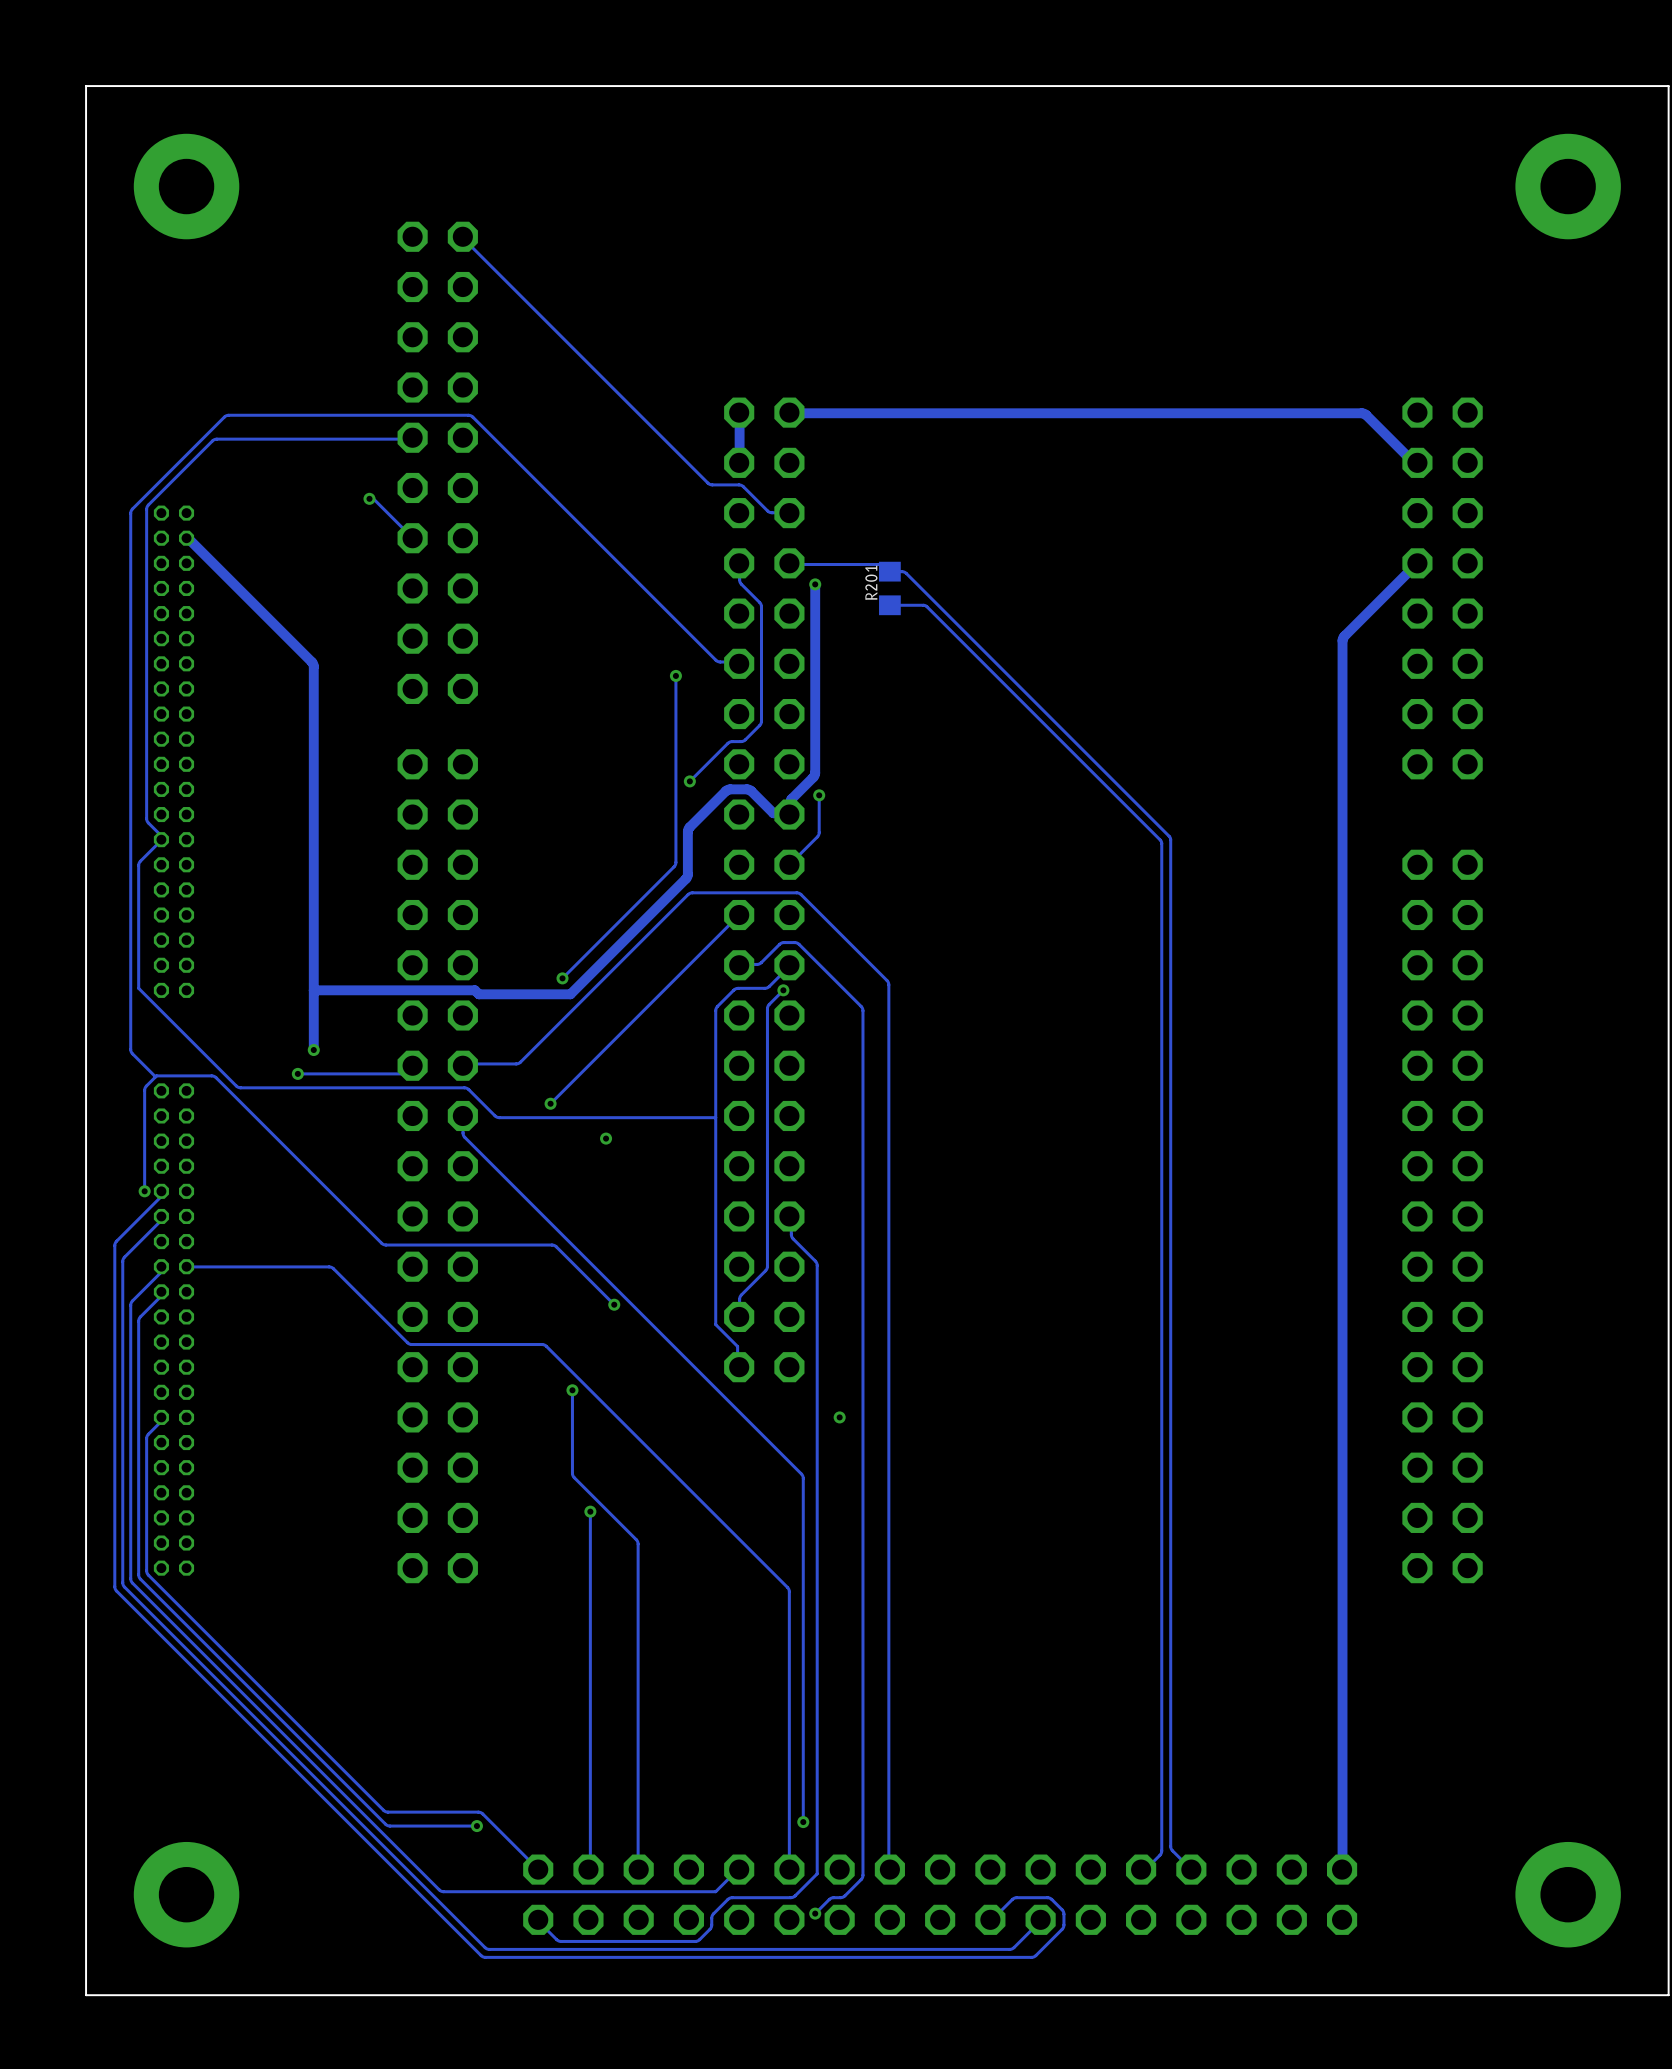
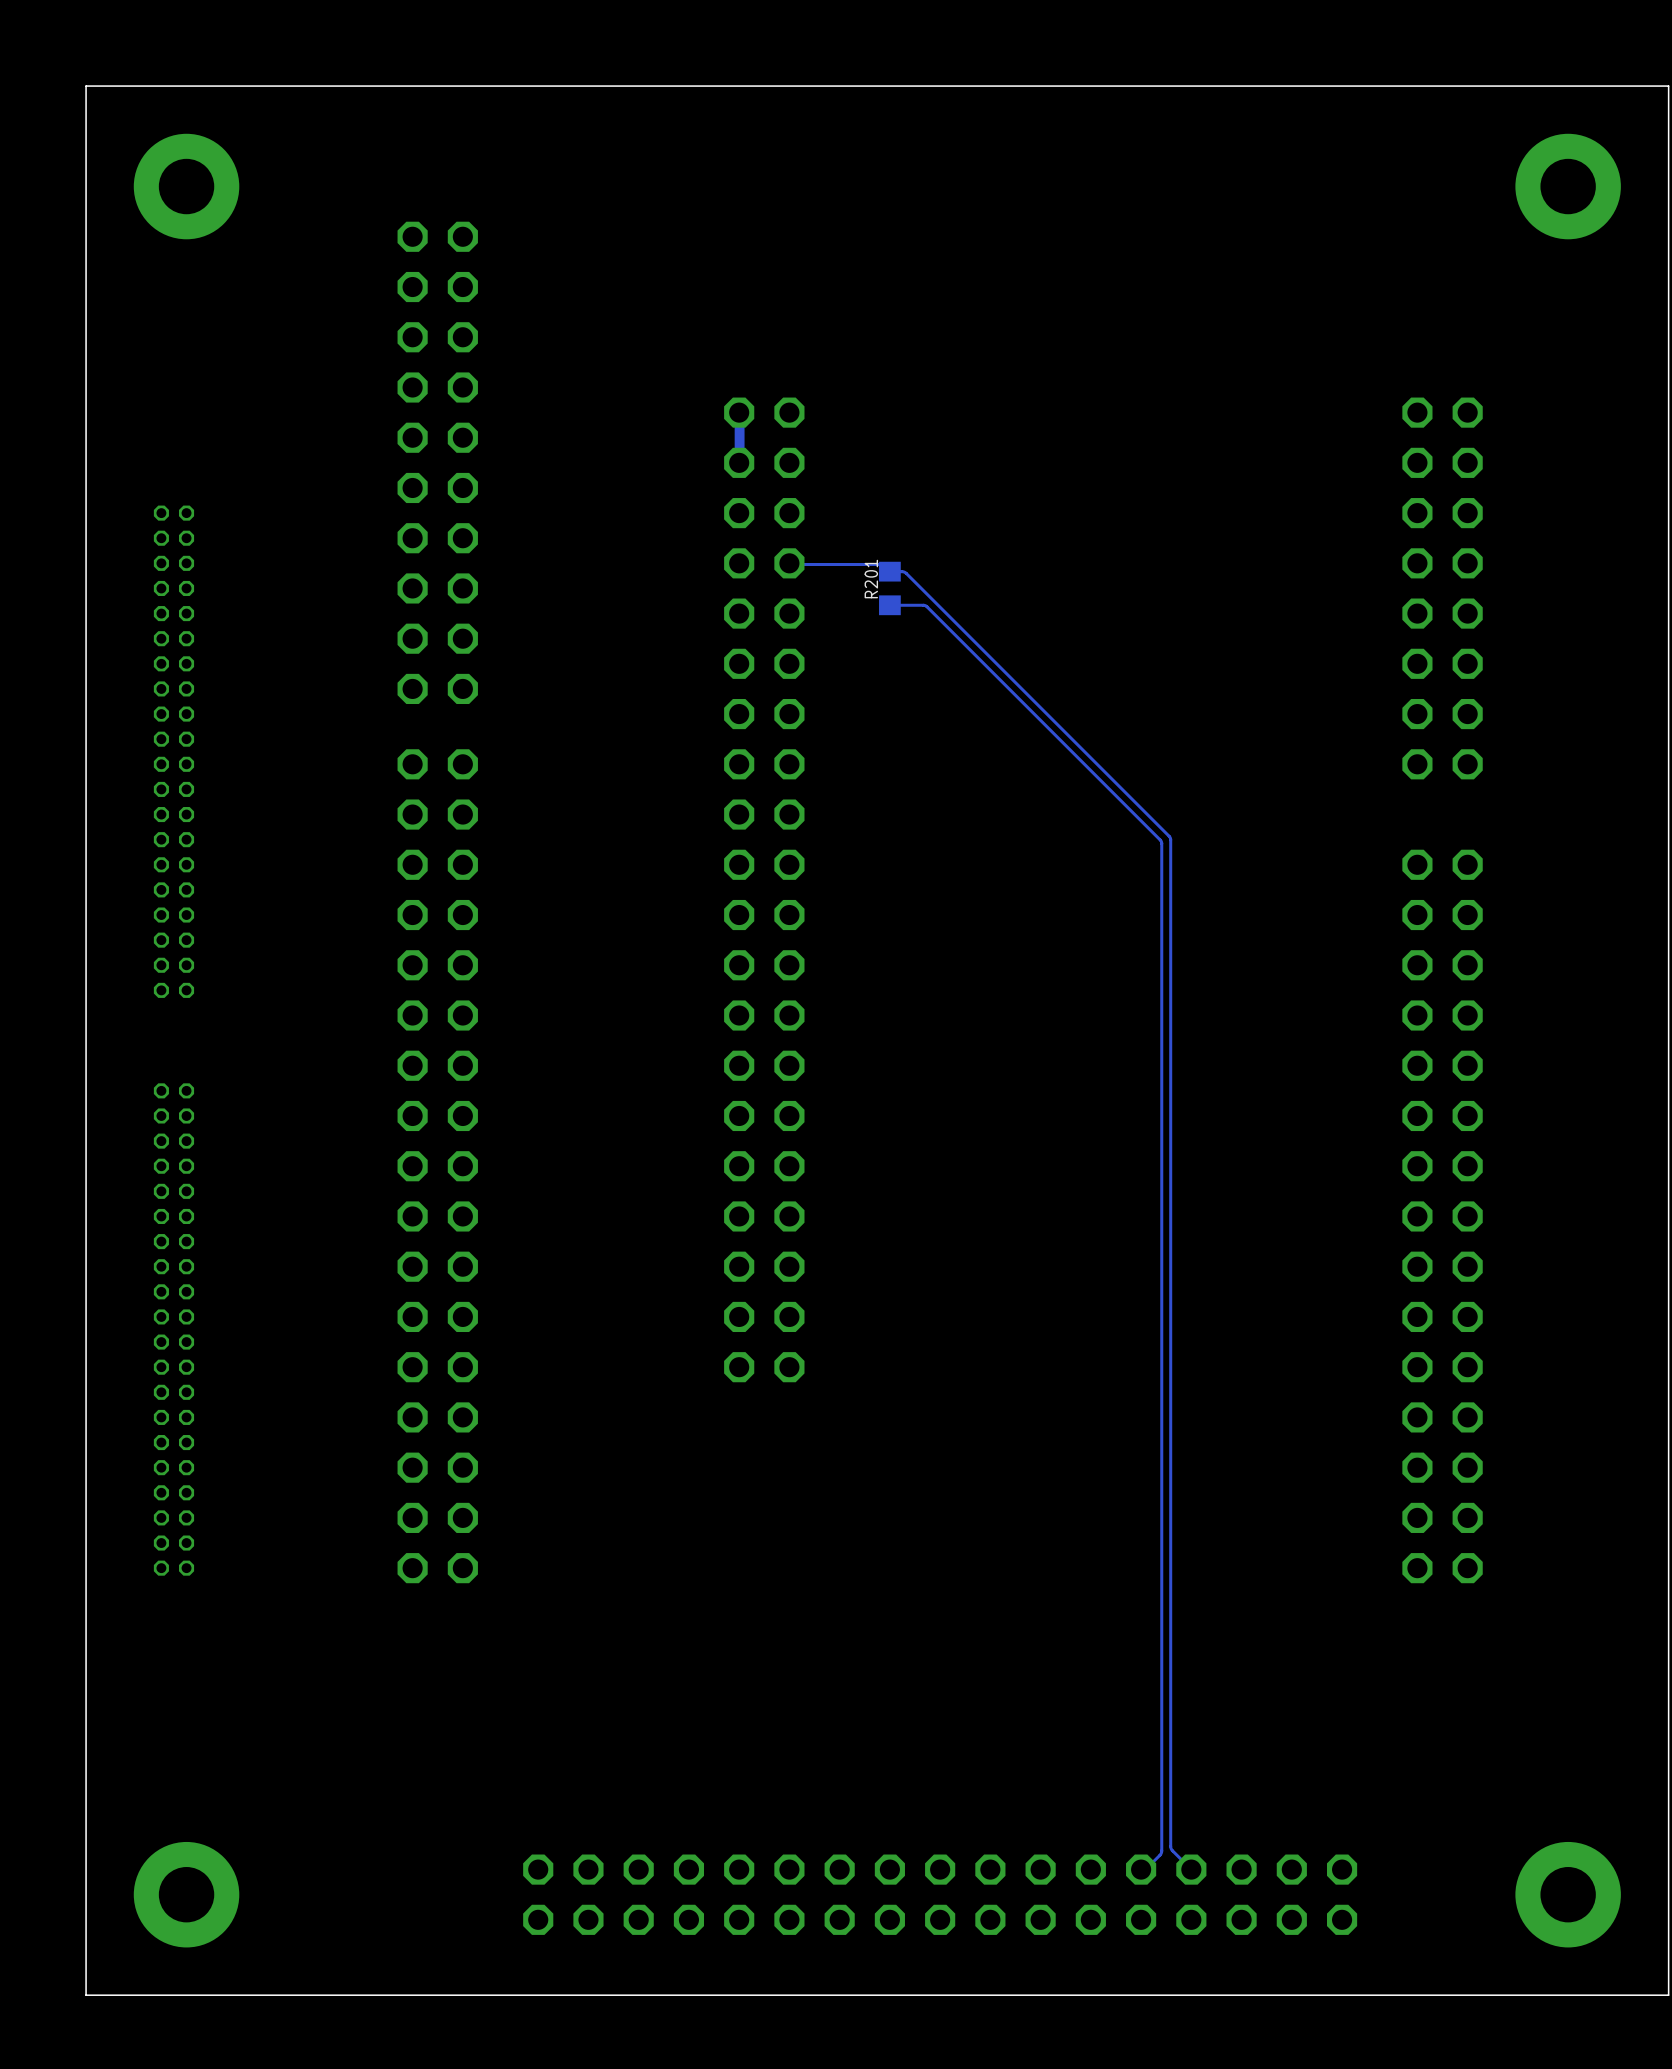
track: (462, 236) (708, 483) (741, 485) (768, 511) (789, 512) -> none
track: (789, 412) (1362, 413) (1412, 461) (1417, 462) -> none
track: (412, 437) (215, 439) (147, 506) (146, 818) (160, 835) (161, 839) (138, 864) (138, 988) (239, 1087) (464, 1087) (468, 1089) (498, 1117) (715, 1117) -> none
track: (369, 498) (373, 498) (412, 538) -> none
via: (369, 498) -> none
track: (186, 538) (313, 664) (313, 1050) -> none
track: (739, 563) (740, 582) (761, 606) (761, 722) (744, 740) (728, 742) (689, 781) -> none
track: (1417, 563) (1344, 636) (1342, 640) (1342, 1869) -> none
track: (815, 584) (814, 775) (791, 799) (789, 814) (773, 813) (749, 789) (730, 789) (725, 791) (688, 829) (686, 878) (570, 994) (478, 994) (474, 990) (313, 990) -> none
via: (815, 584) -> none
track: (739, 663) (737, 662) (715, 660) (470, 415) (225, 416) (130, 512) (130, 1049) (132, 1053) (155, 1076) -> none
track: (675, 675) (675, 864) (562, 978) -> none
via: (675, 675) -> none
via: (689, 781) -> none
track: (819, 795) (818, 834) (789, 864) -> none
via: (819, 795) -> none
track: (739, 915) (550, 1103) -> none
track: (739, 965) (759, 963) (780, 943) (797, 943) (862, 1010) (862, 1875) (861, 1879) (844, 1896) (830, 1898) (815, 1913) -> none
track: (789, 965) (768, 987) (735, 988) (715, 1010) (715, 1324) (737, 1346) (737, 1366) (739, 1367) -> none
via: (562, 978) -> none
track: (783, 990) (768, 1005) (767, 1008) (767, 1267) (740, 1296) (739, 1316) -> none
via: (783, 990) -> none
via: (313, 1050) -> none
track: (412, 1065) (403, 1073) (297, 1073) -> none
track: (462, 1065) (463, 1063) (519, 1062) (691, 892) (799, 893) (888, 981) (889, 1869) -> none
via: (297, 1073) -> none
via: (550, 1103) -> none
track: (462, 1115) (464, 1137) (802, 1476) (803, 1822) -> none
via: (606, 1138) -> none
track: (144, 1191) (145, 1087) (156, 1075) (213, 1076) (382, 1244) (553, 1245) (614, 1304) -> none
via: (144, 1191) -> none
track: (161, 1191) (160, 1197) (114, 1244) (115, 1589) (481, 1955) (485, 1957) (1032, 1957) (1062, 1928) (1063, 1913) (1049, 1897) (1015, 1897) (990, 1919) -> none
track: (161, 1216) (160, 1221) (122, 1260) (123, 1585) (485, 1948) (1009, 1949) (1014, 1947) (1040, 1919) -> none
track: (789, 1216) (791, 1217) (792, 1237) (815, 1261) (817, 1265) (817, 1873) (792, 1897) (729, 1898) (712, 1915) (710, 1928) (696, 1941) (560, 1941) (538, 1919) -> none
track: (161, 1266) (160, 1272) (130, 1304) (130, 1578) (132, 1583) (441, 1891) (715, 1891) (739, 1869) -> none
track: (186, 1266) (330, 1267) (409, 1344) (542, 1344) (546, 1346) (788, 1589) (789, 1869) -> none
track: (161, 1291) (160, 1296) (138, 1320) (139, 1577) (386, 1824) (476, 1826) -> none
via: (614, 1304) -> none
track: (572, 1390) (572, 1475) (638, 1543) (638, 1869) -> none
via: (572, 1390) -> none
track: (161, 1417) (160, 1422) (146, 1437) (147, 1574) (384, 1810) (480, 1812) (538, 1869) -> none
via: (839, 1417) -> none
track: (590, 1511) (590, 1867) (588, 1869) -> none
via: (590, 1511) -> none
via: (803, 1822) -> none
via: (476, 1826) -> none
via: (815, 1913) -> none

